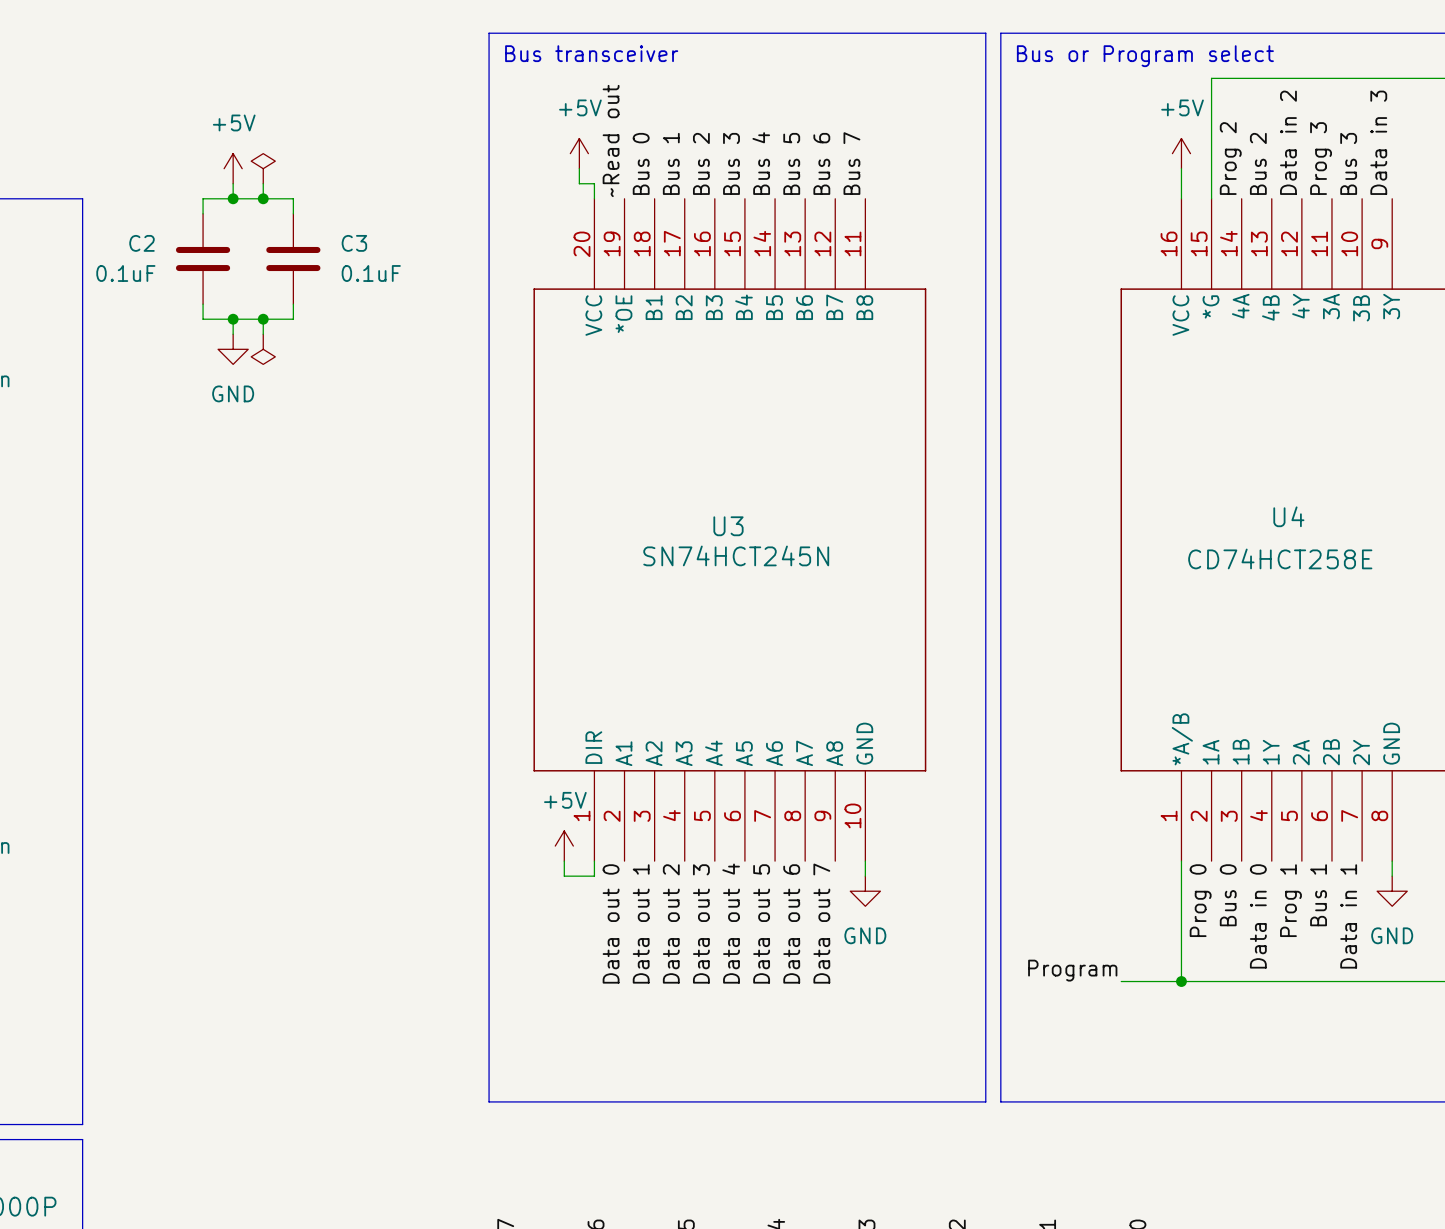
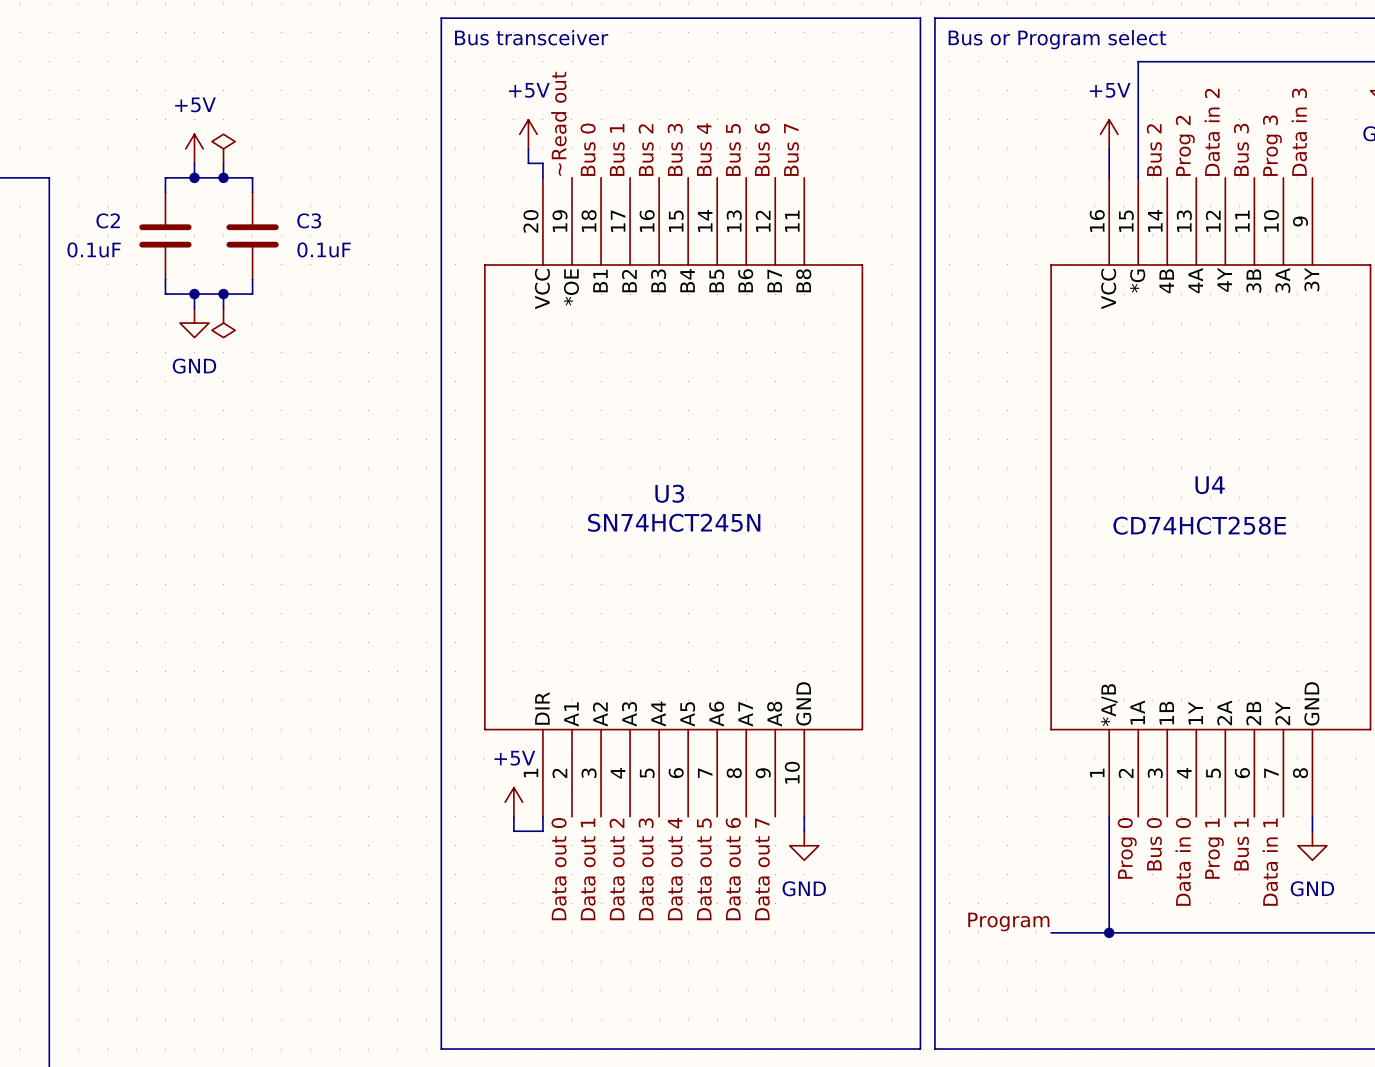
label: Prog 2 (1230, 158) -> Bus 2 (1154, 150)
label: Prog 3 (1321, 158) -> Bus 3 (1241, 149)
label: Bus 2 (1258, 163) -> Prog 2 (1185, 145)
label: Bus 3 (1348, 163) -> Prog 3 (1272, 145)
U4 pin name: 4A (1240, 306) -> 4B (1166, 281)
U4 pin name: 3A (1331, 306) -> 3B (1253, 281)
U4 pin name: 4B (1270, 308) -> 4A (1195, 280)
U4 pin name: 3B (1361, 308) -> 3A (1282, 280)

